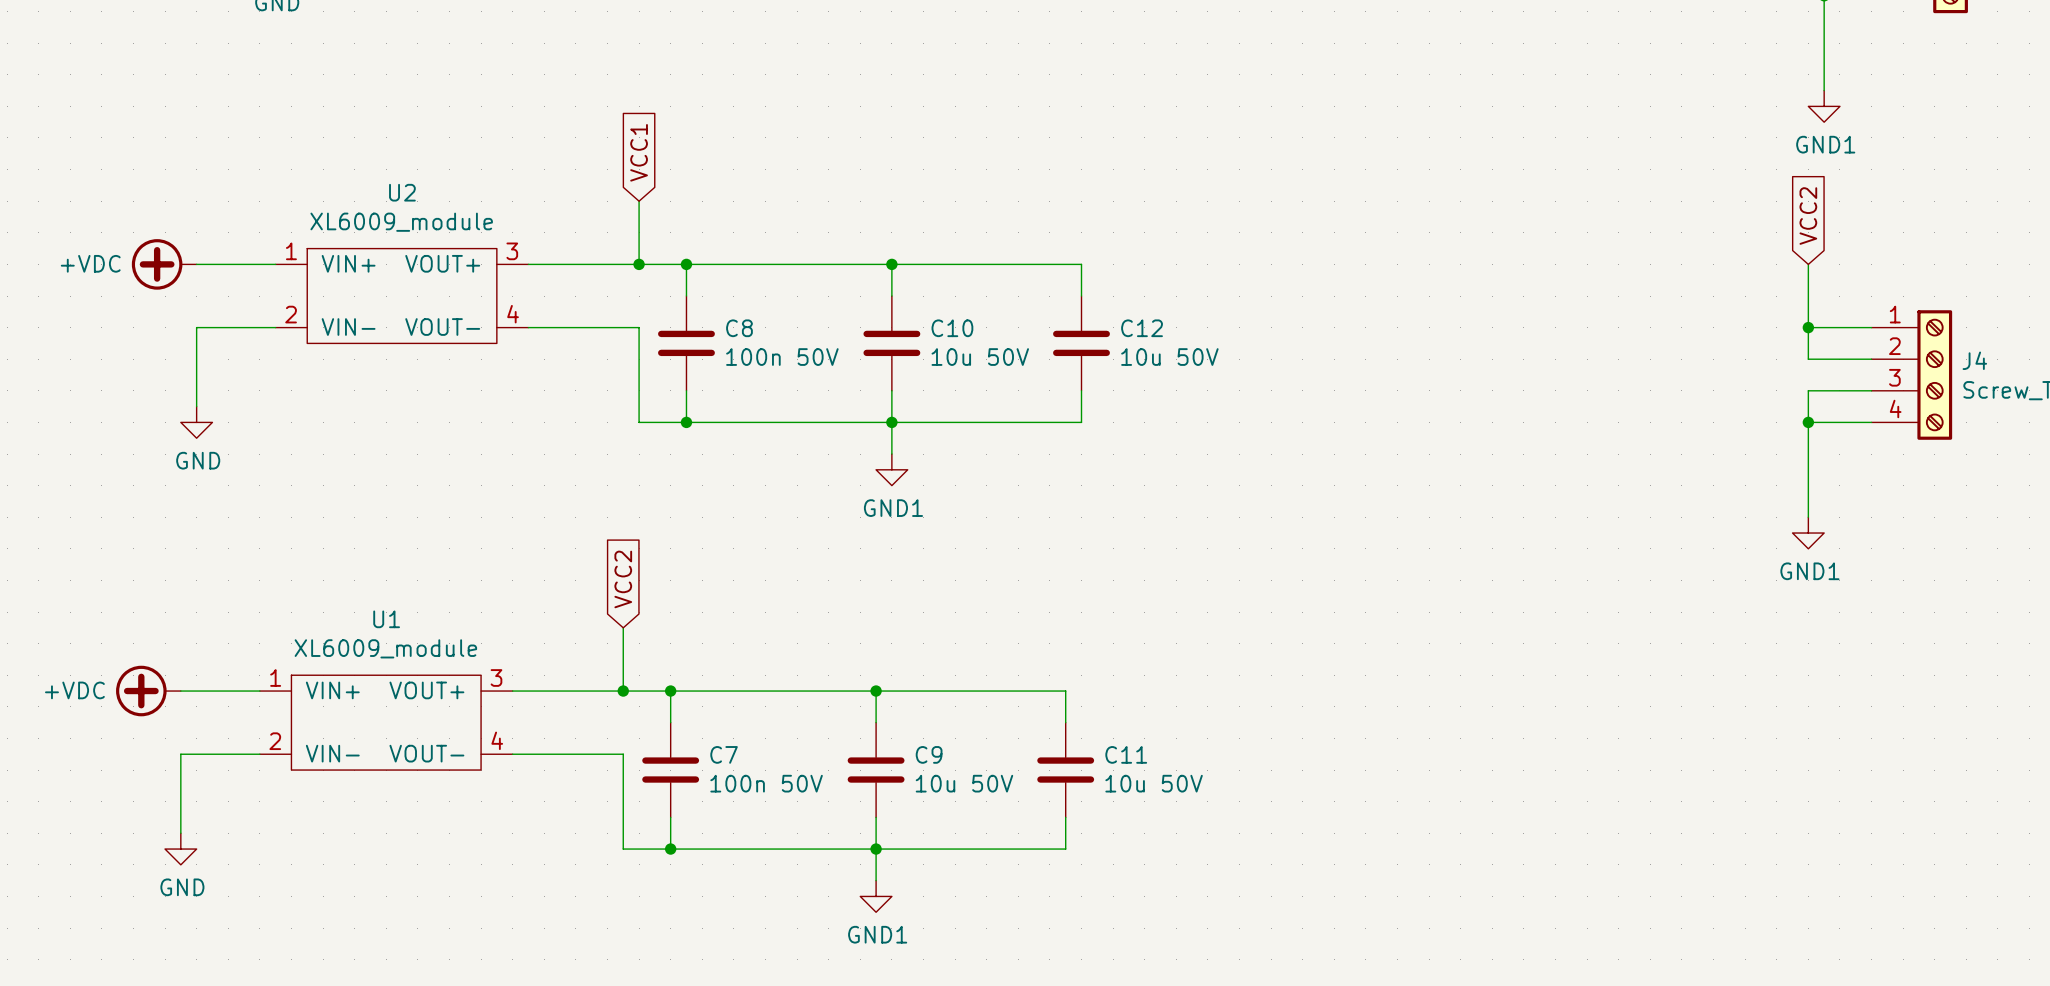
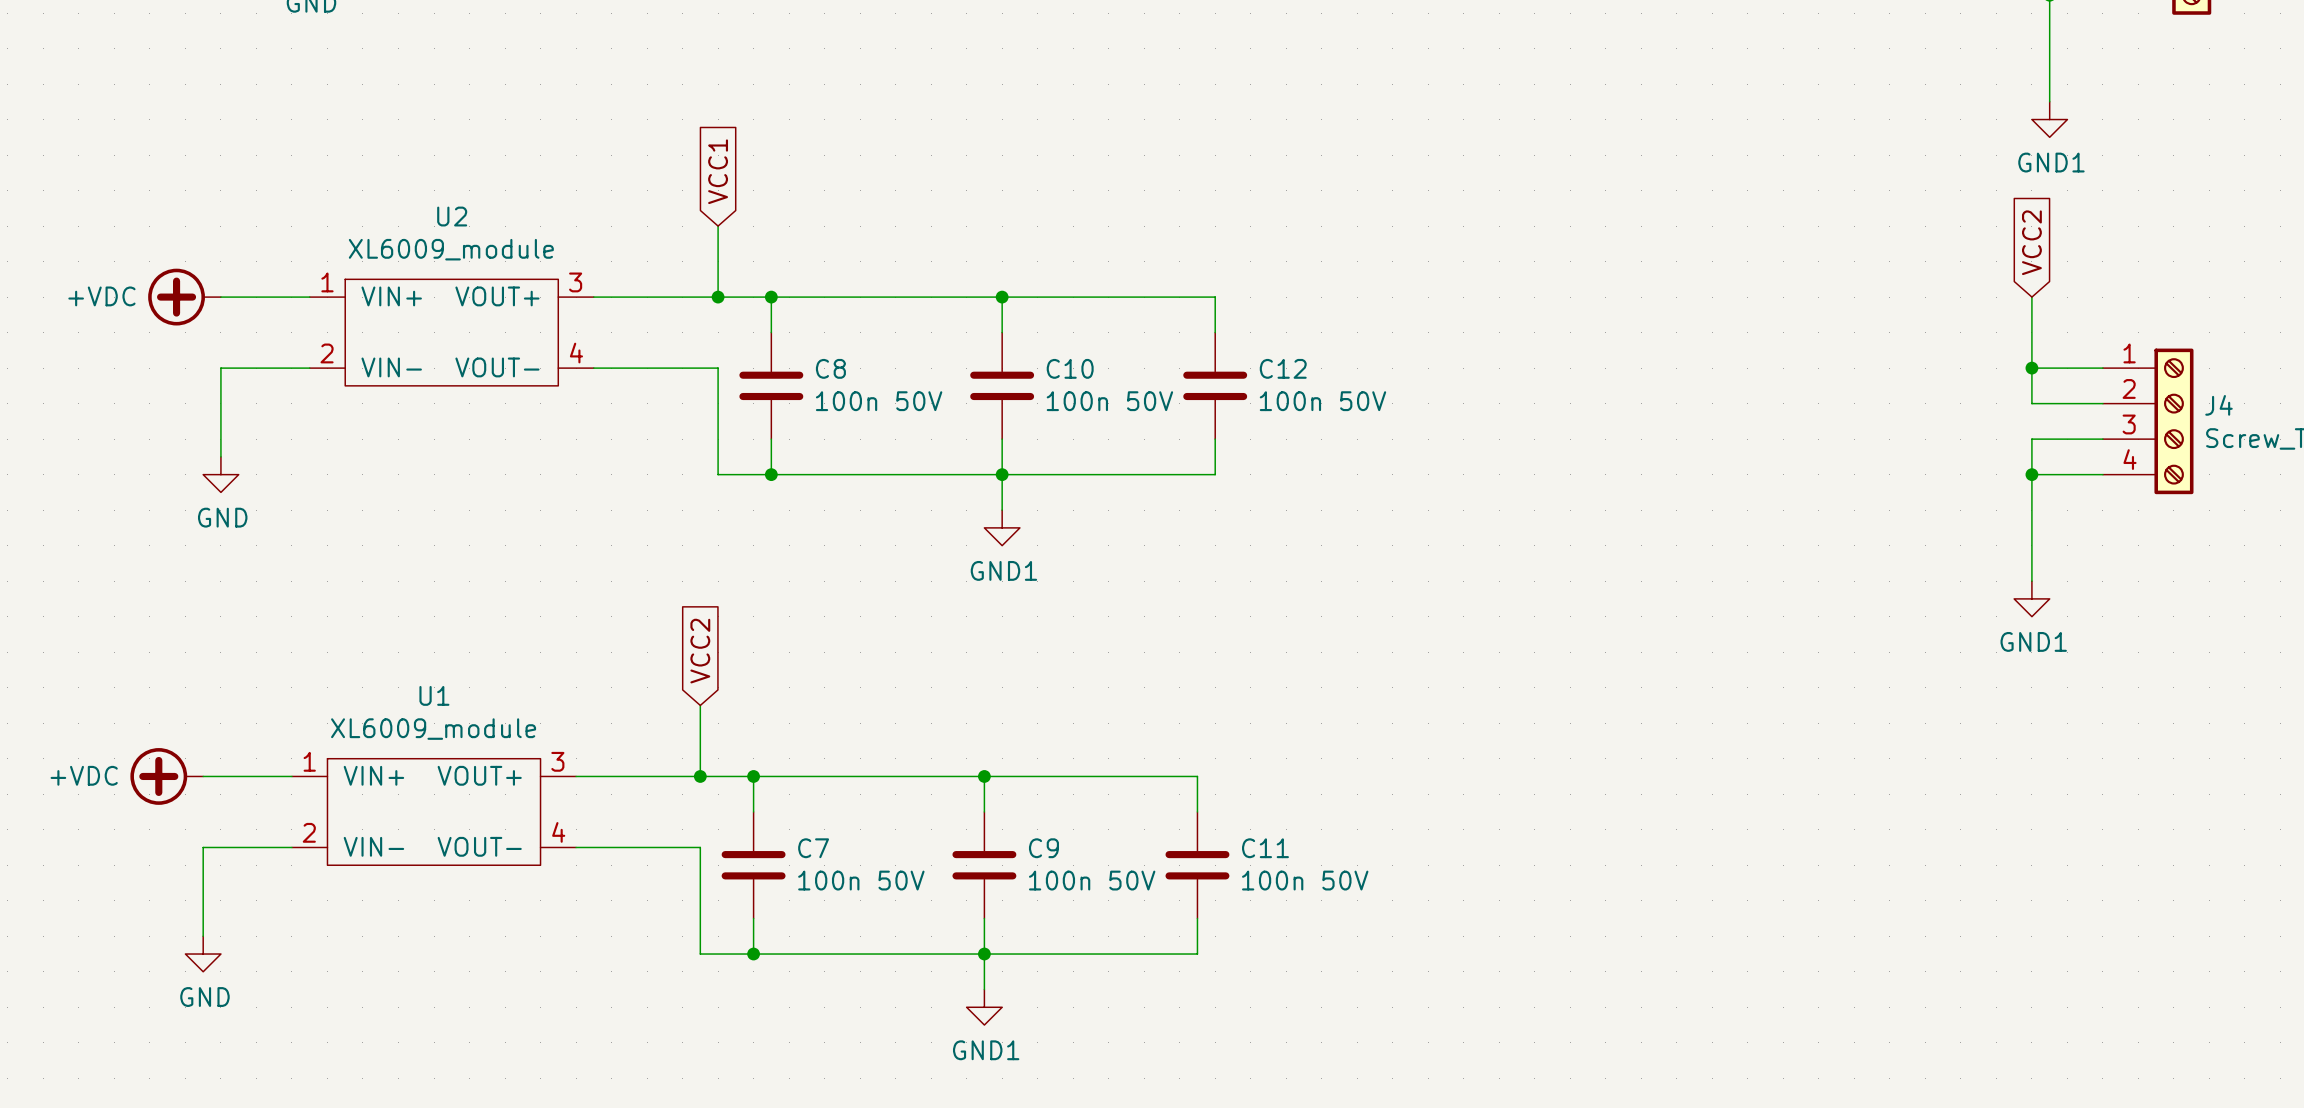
C10 value: 10u 50V (980, 357) -> 100n 50V (1109, 401)
C12 value: 10u 50V (1169, 357) -> 100n 50V (1322, 401)
C9 value: 10u 50V (964, 783) -> 100n 50V (1092, 880)
C11 value: 10u 50V (1154, 783) -> 100n 50V (1305, 880)

